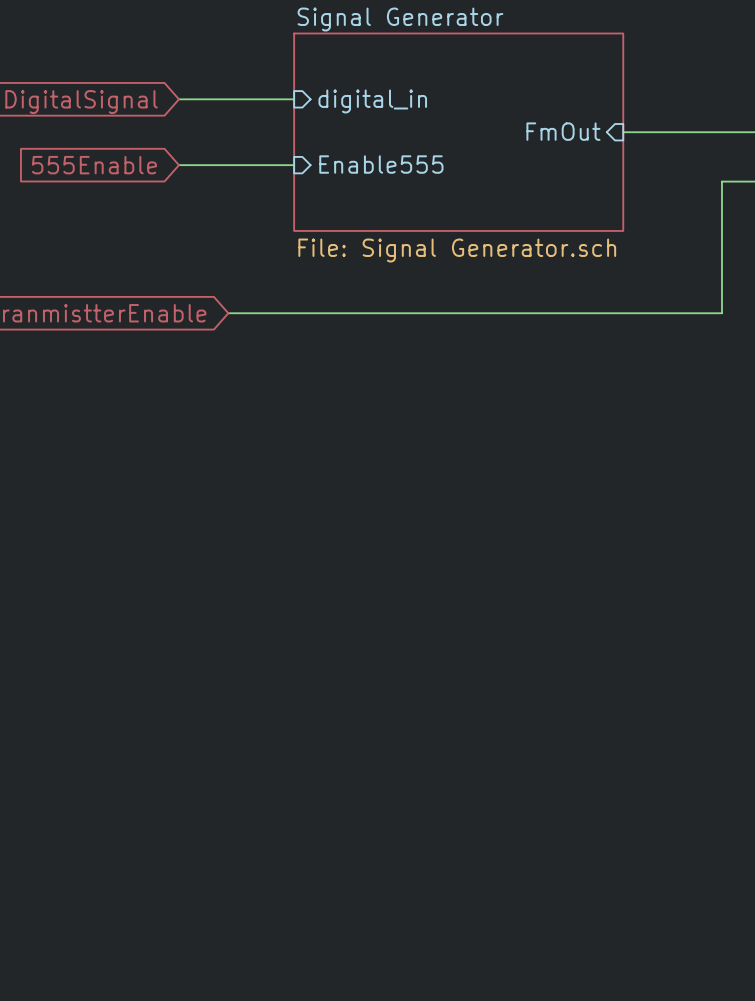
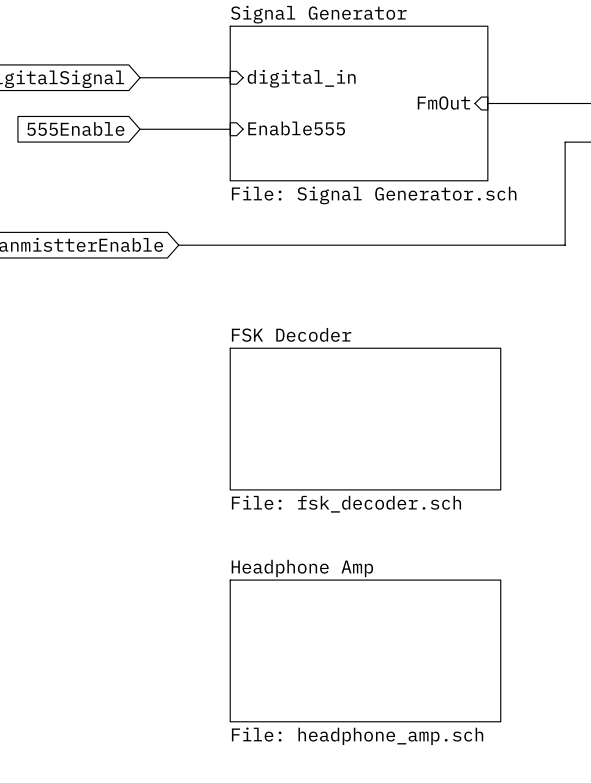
sheet FSK Decoder: none -> File: fsk_decoder.sch (365, 419)
sheet Headphone Amp: none -> File: headphone_amp.sch (365, 650)

